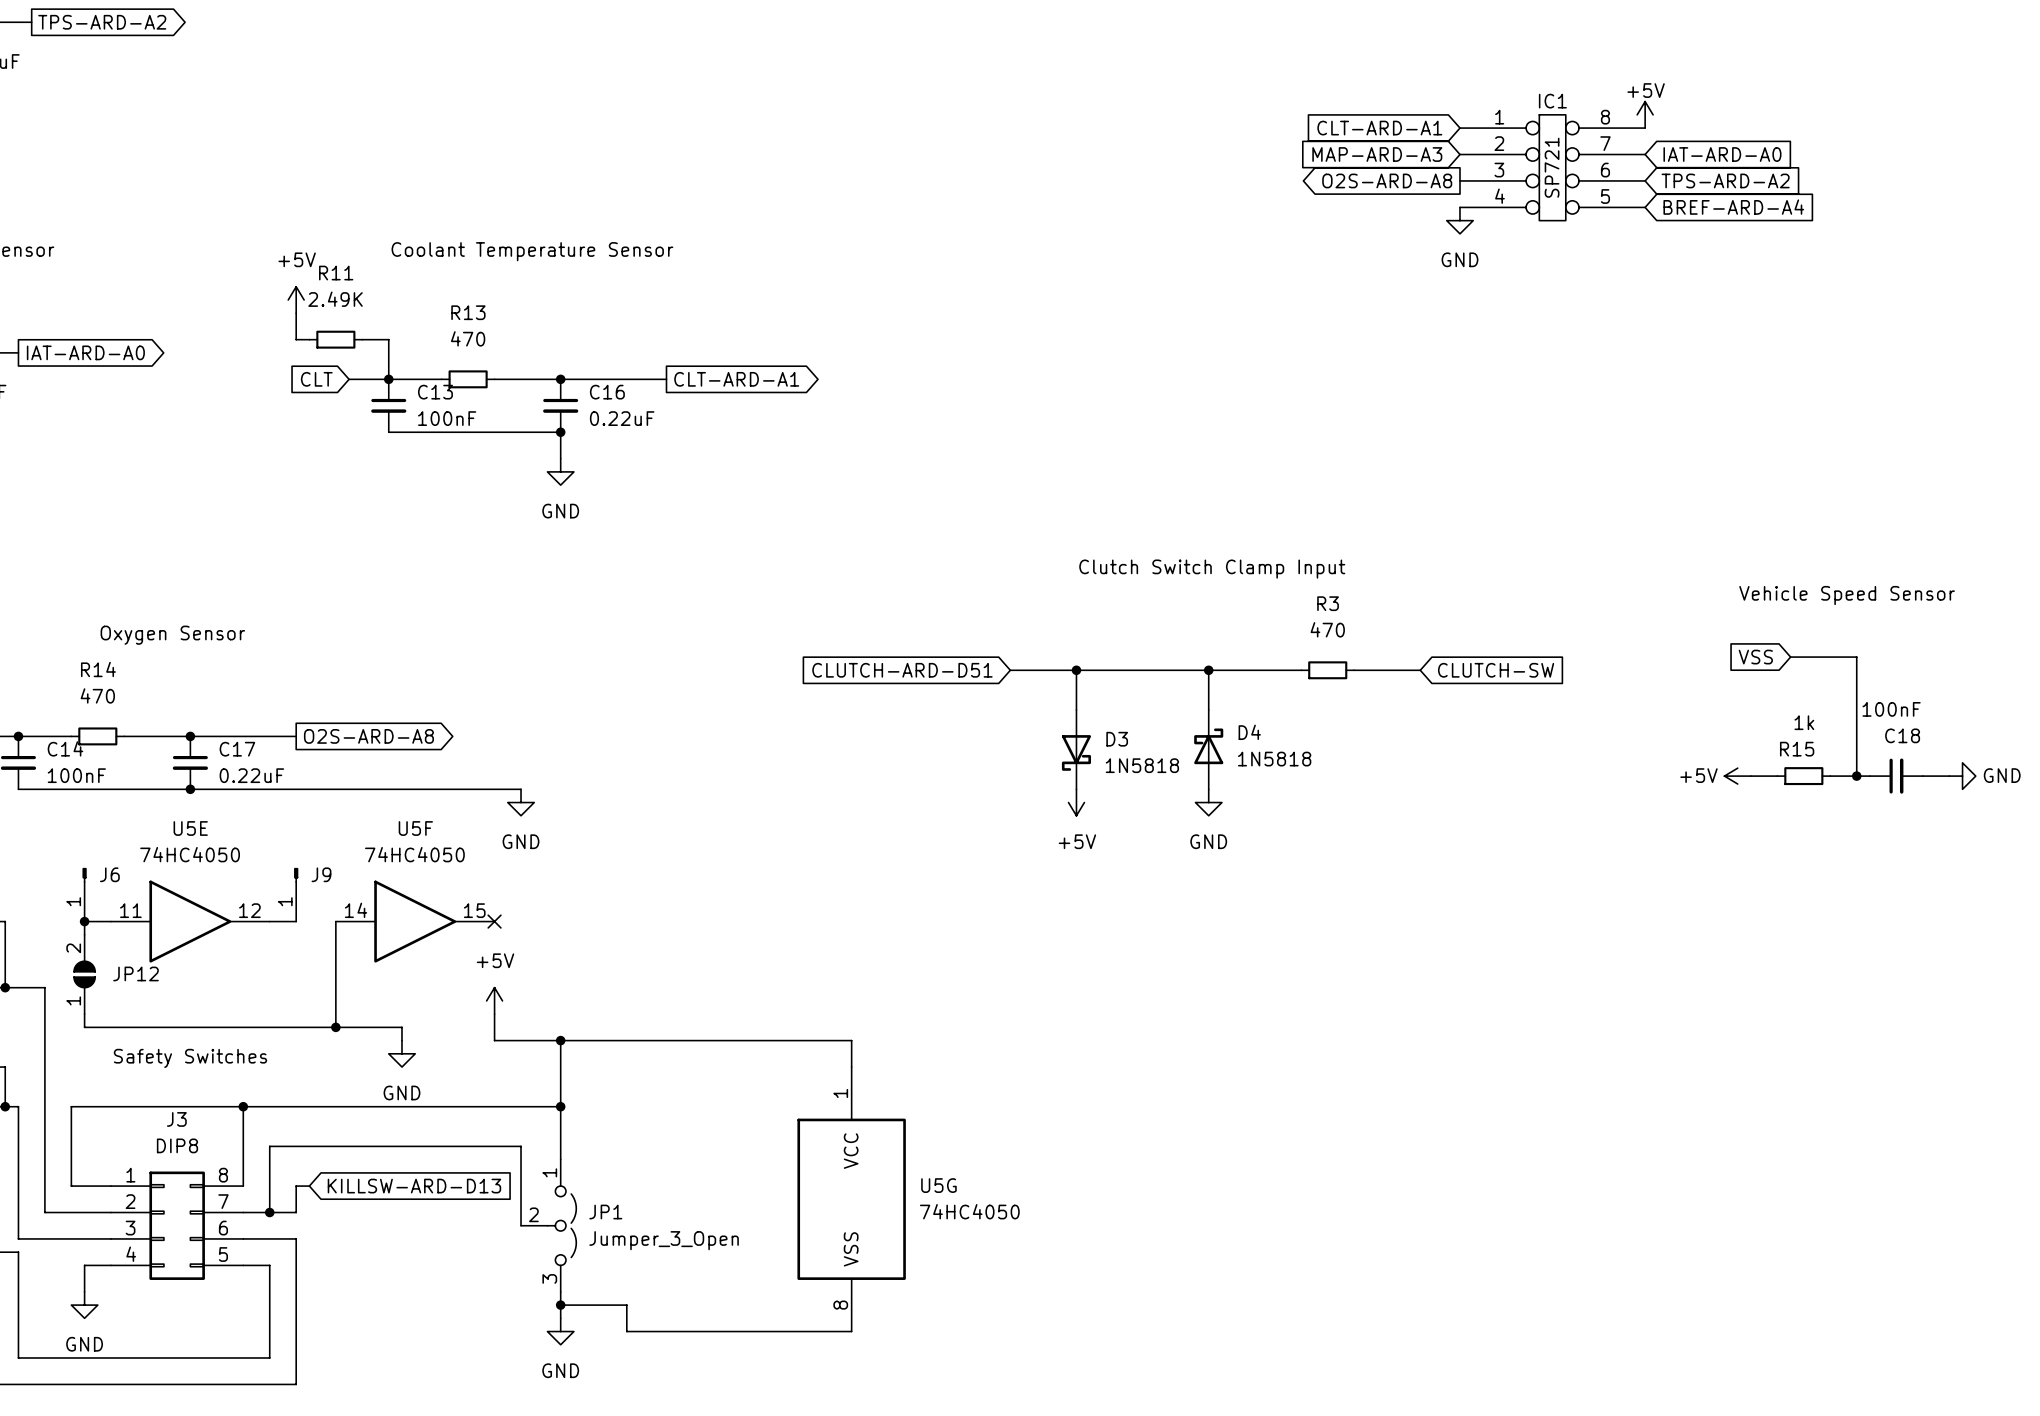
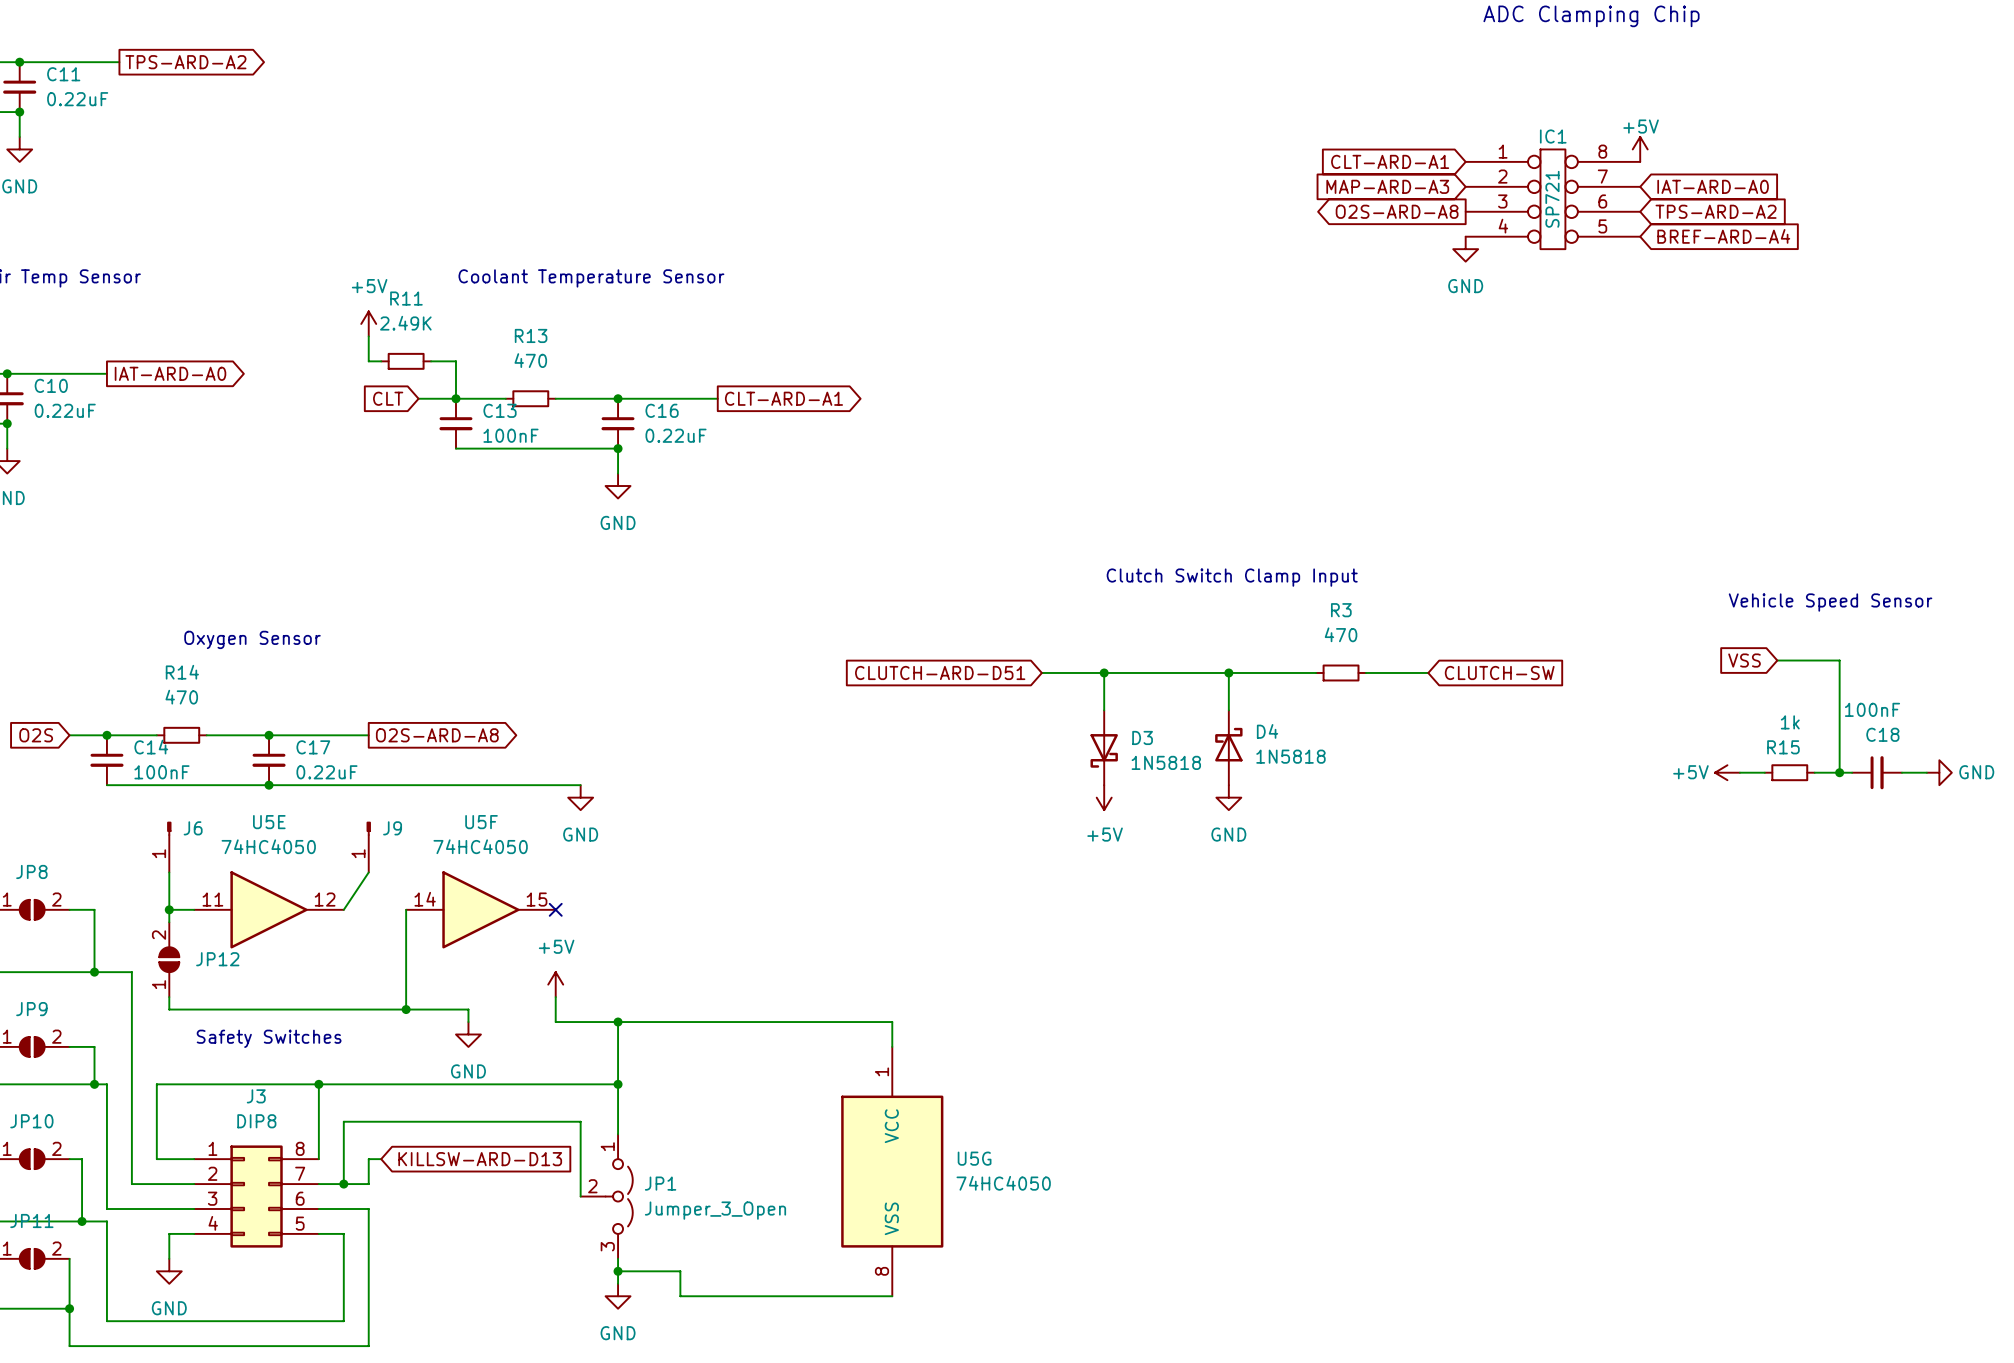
J6 position: (84, 894) -> (169, 847)
J9 position: (296, 894) -> (368, 847)
wire: (269, 921) (296, 921) -> (343, 909) (368, 872)

